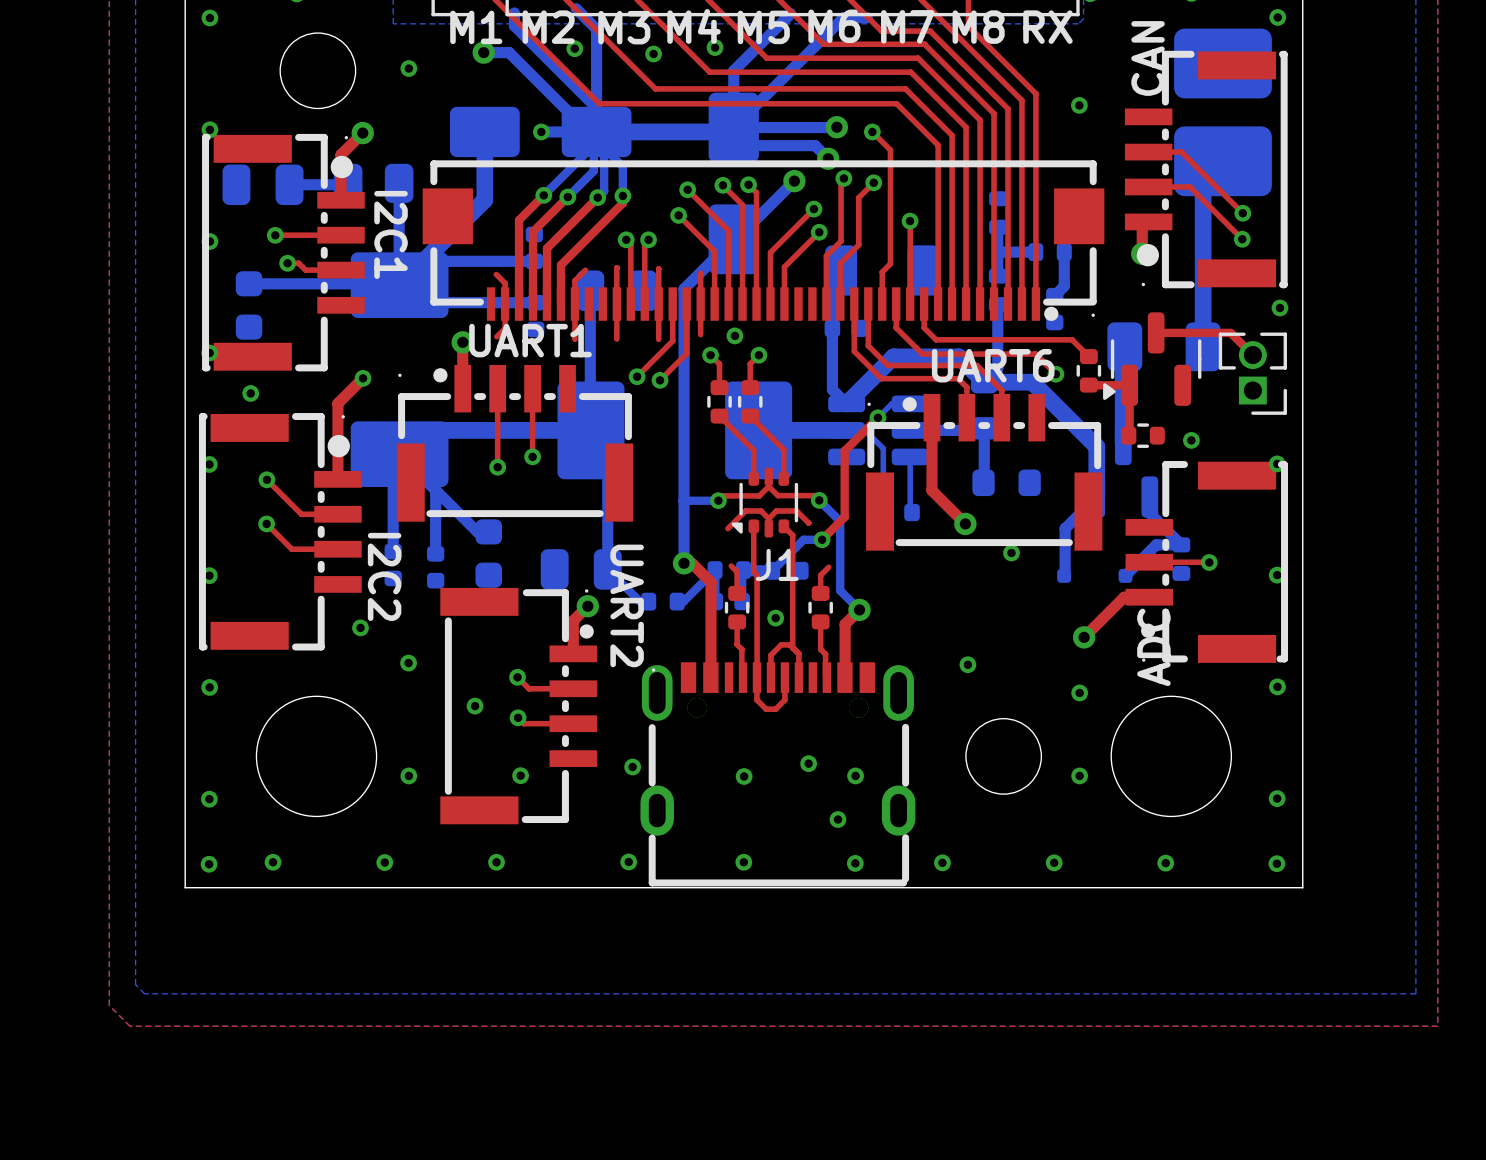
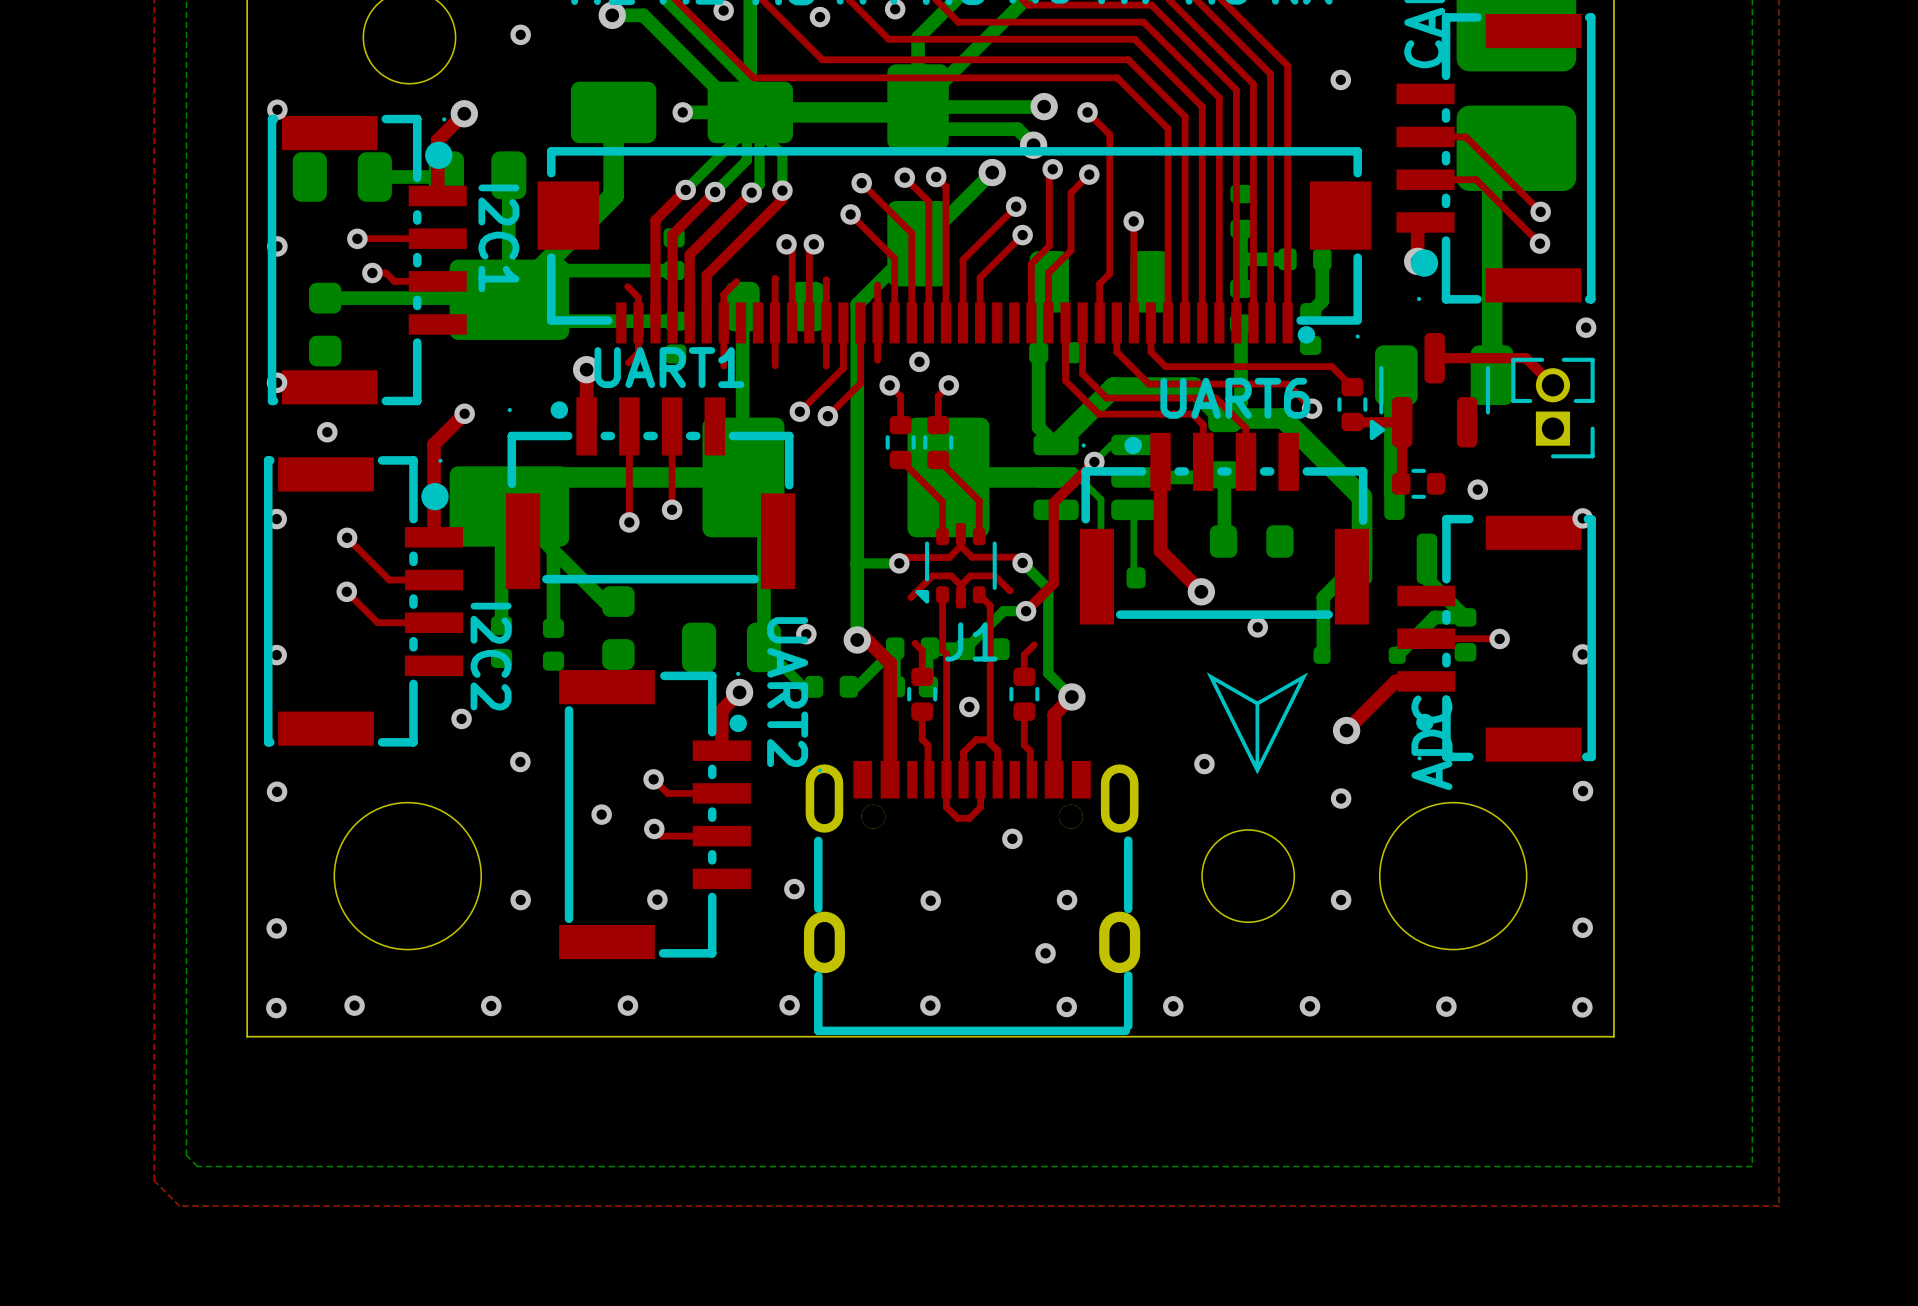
via: none -> (806, 634)
drawing: none -> [1206, 672, 1309, 775]
via position: (808, 763) -> (1012, 838)

